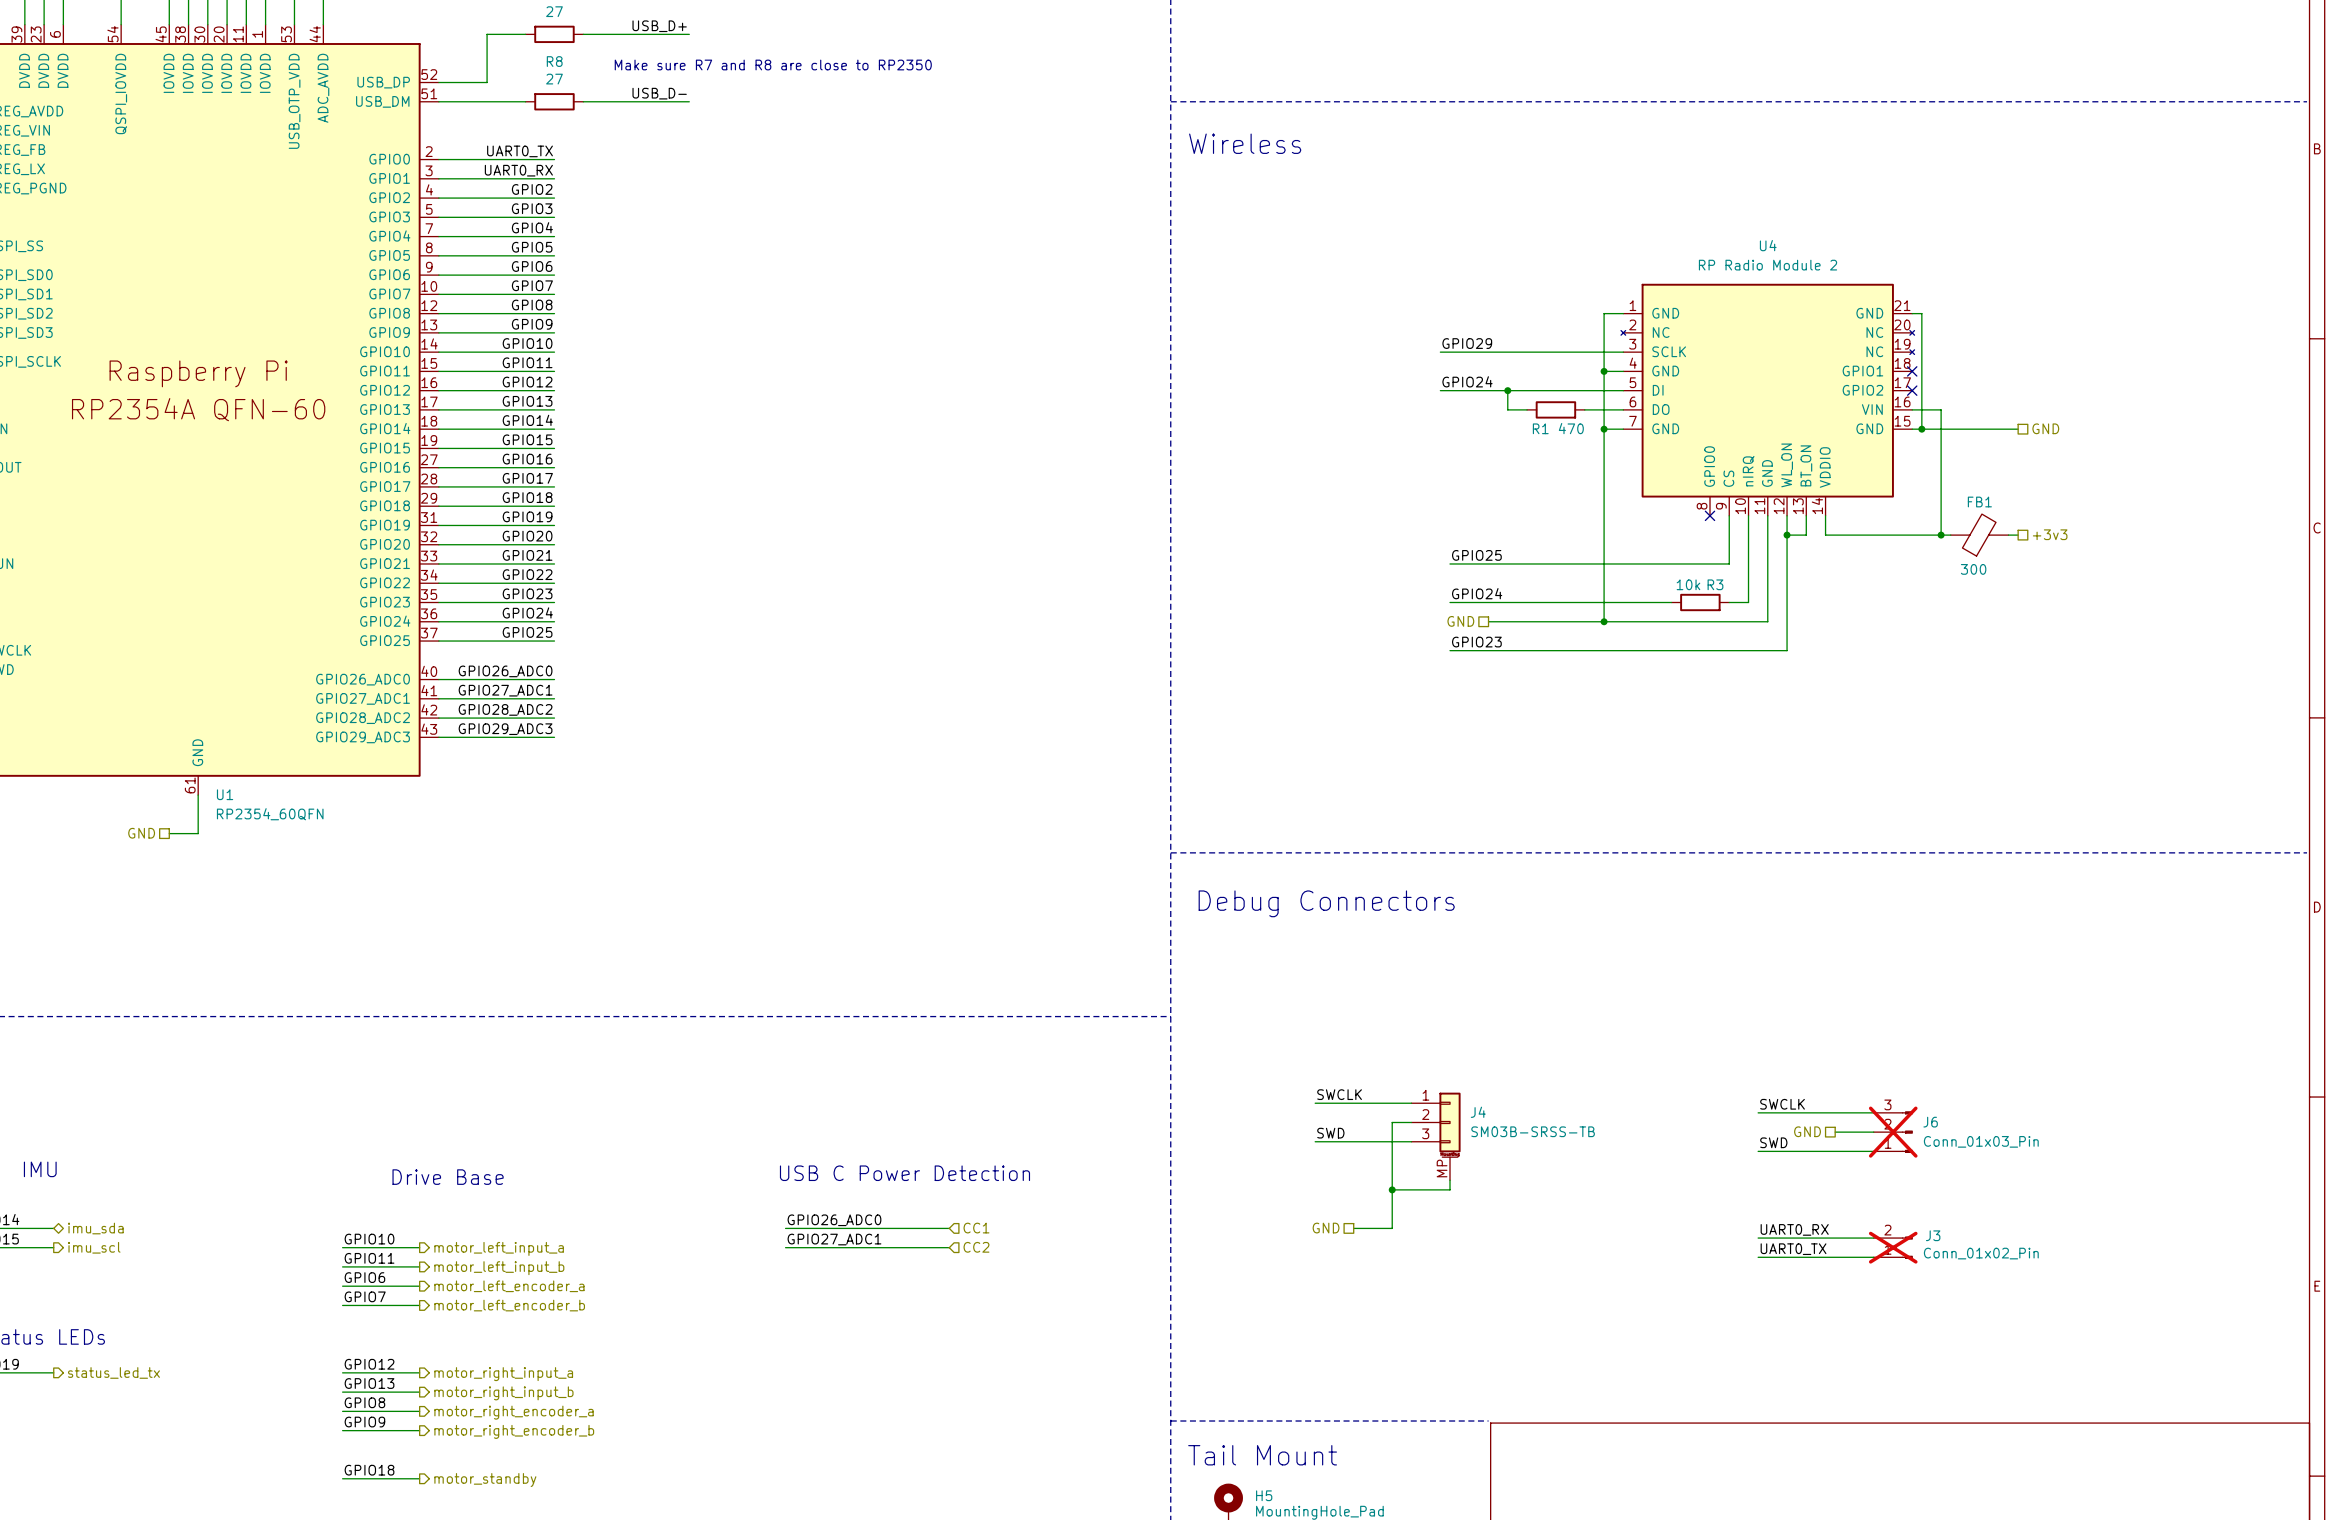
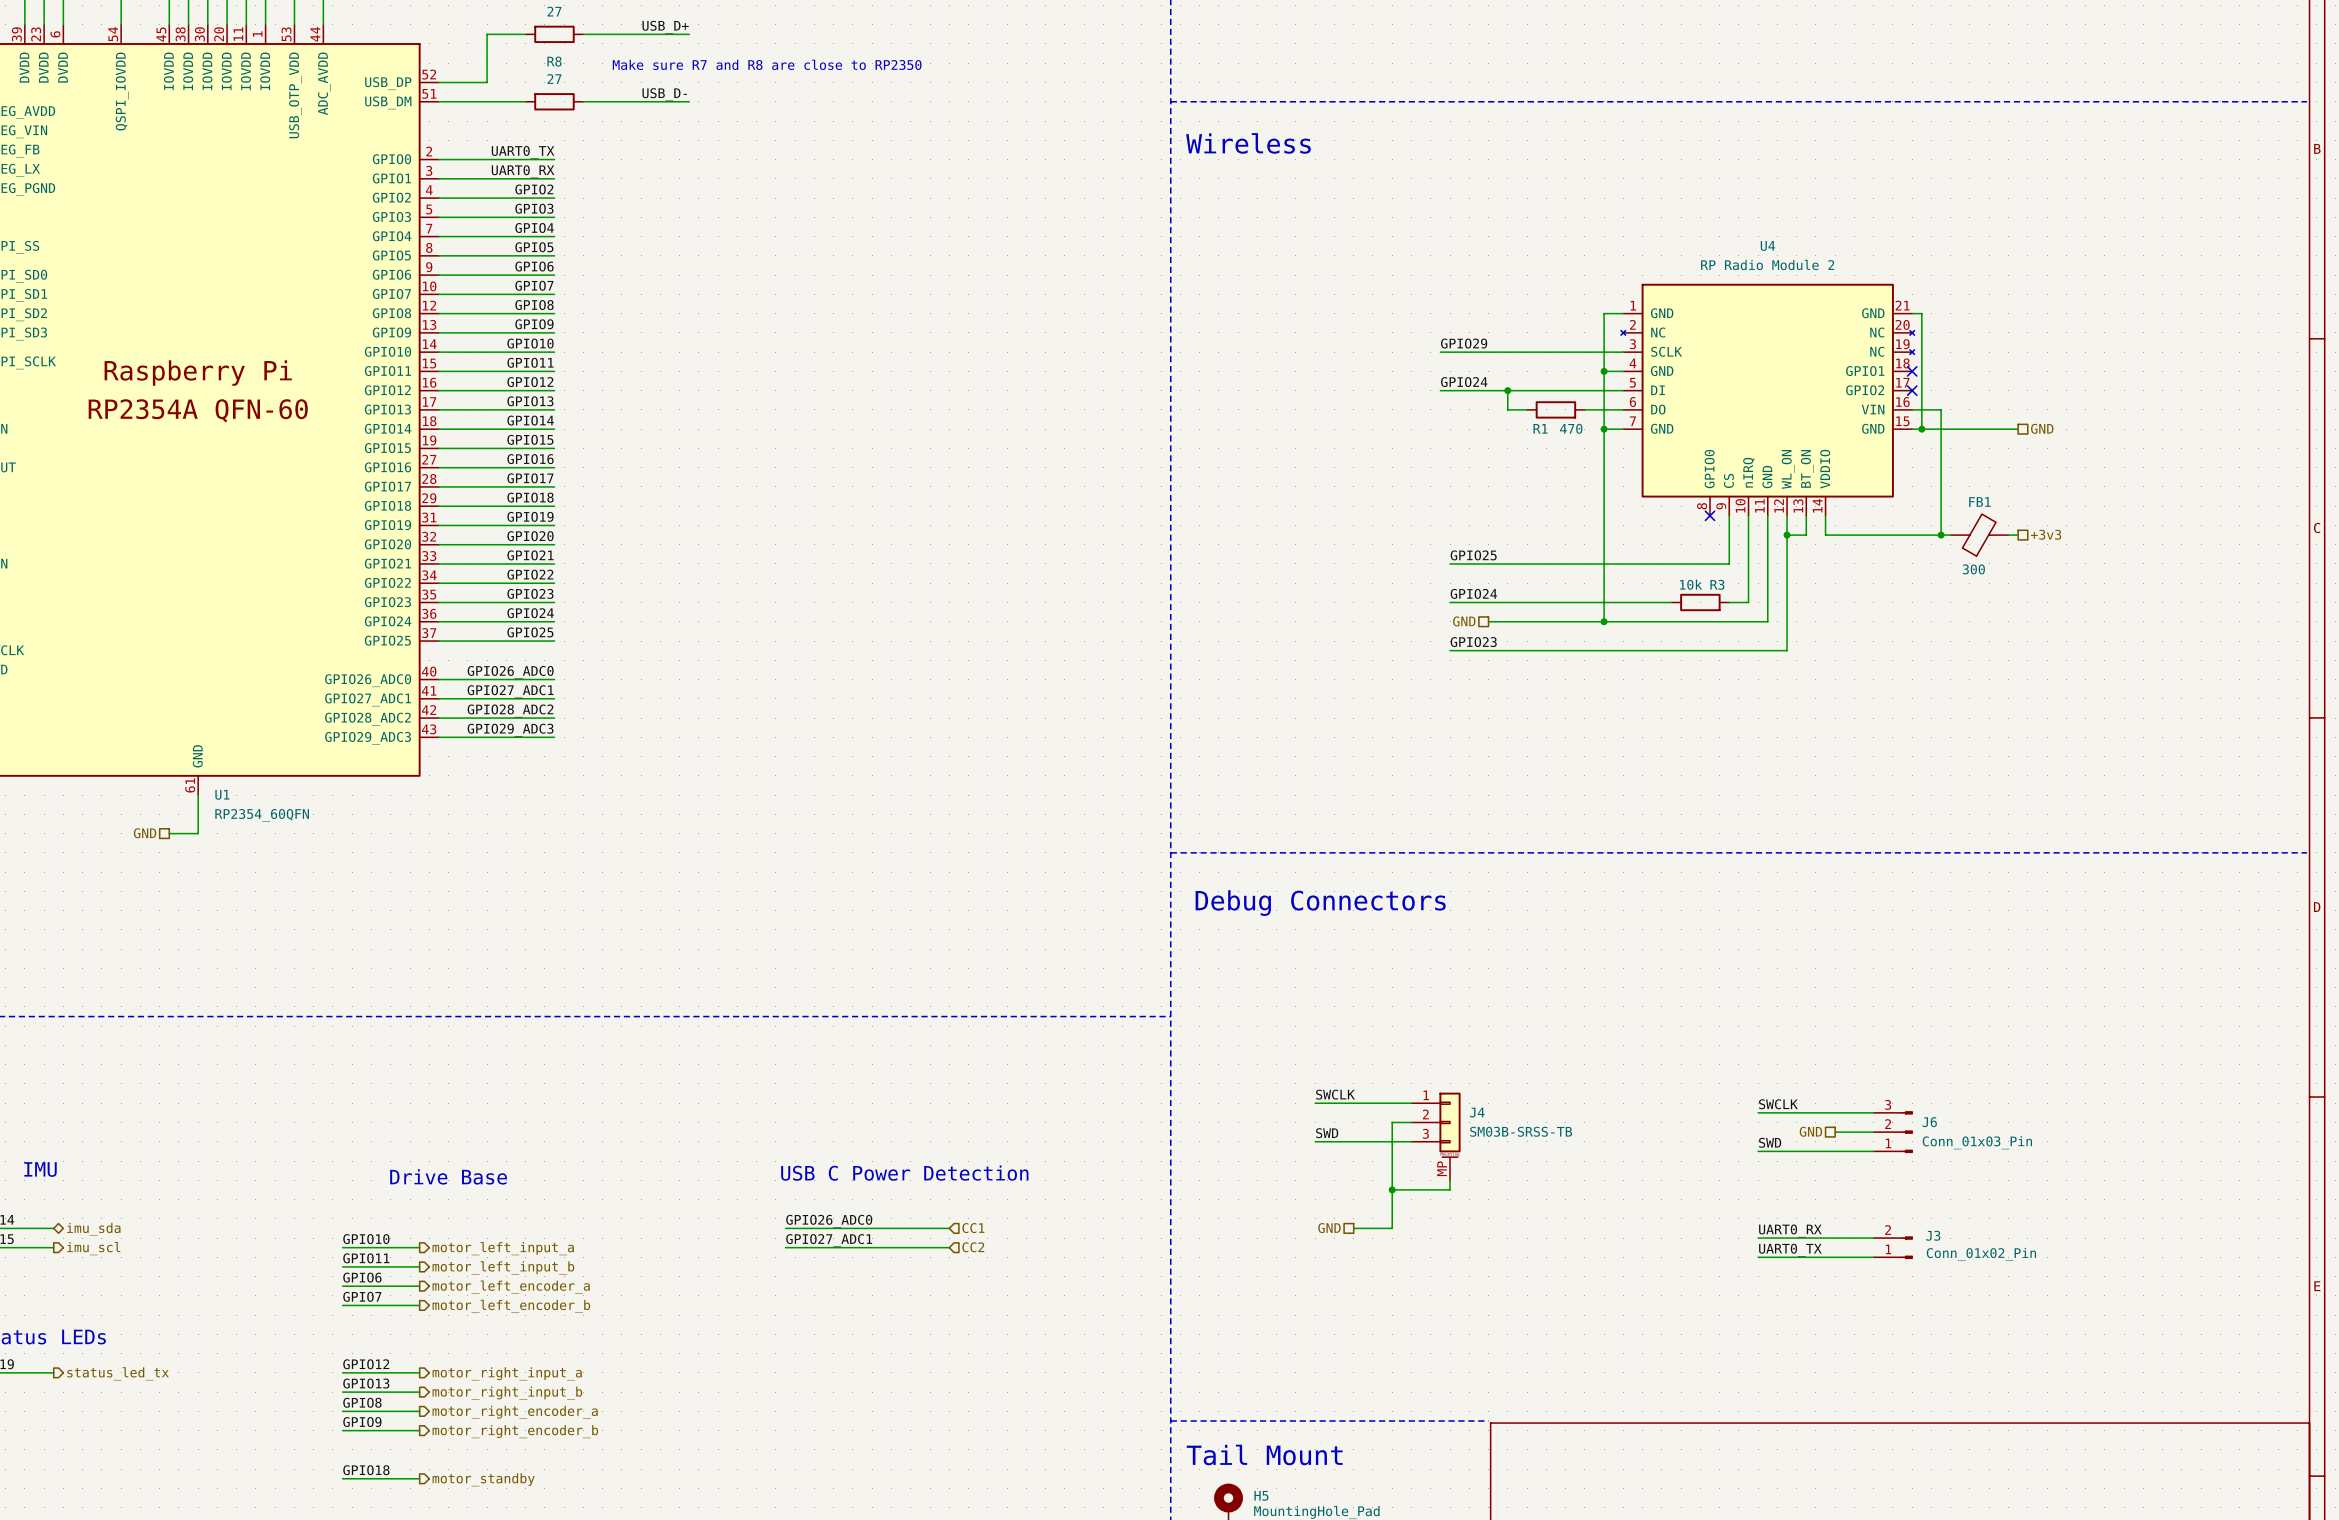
J6 do-not-place cross: (1893, 1132) -> none
J3 do-not-place cross: (1893, 1247) -> none

